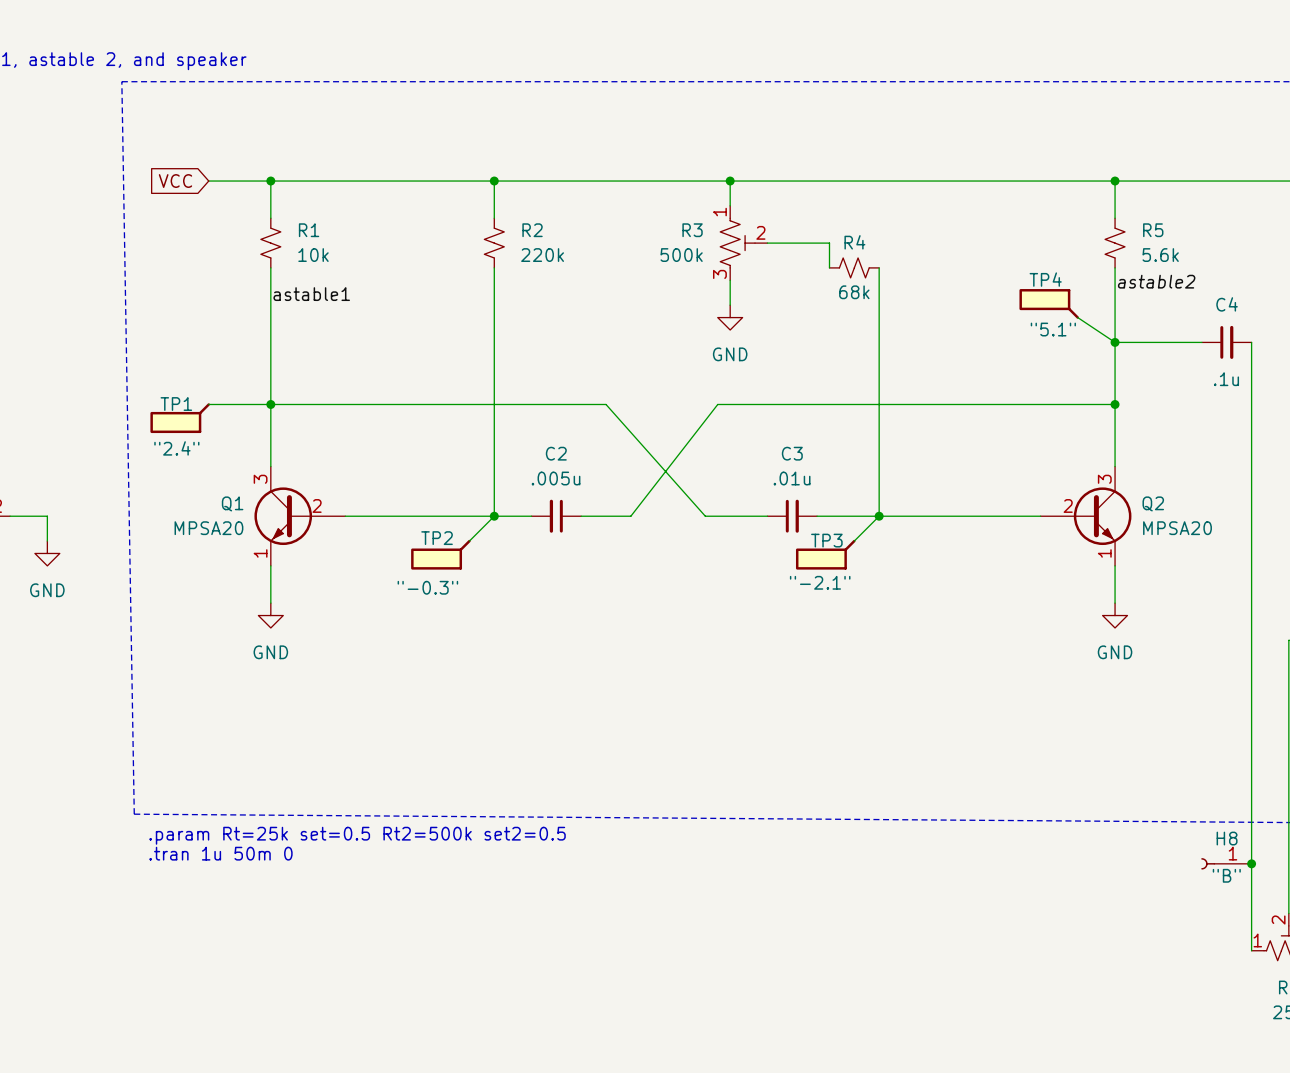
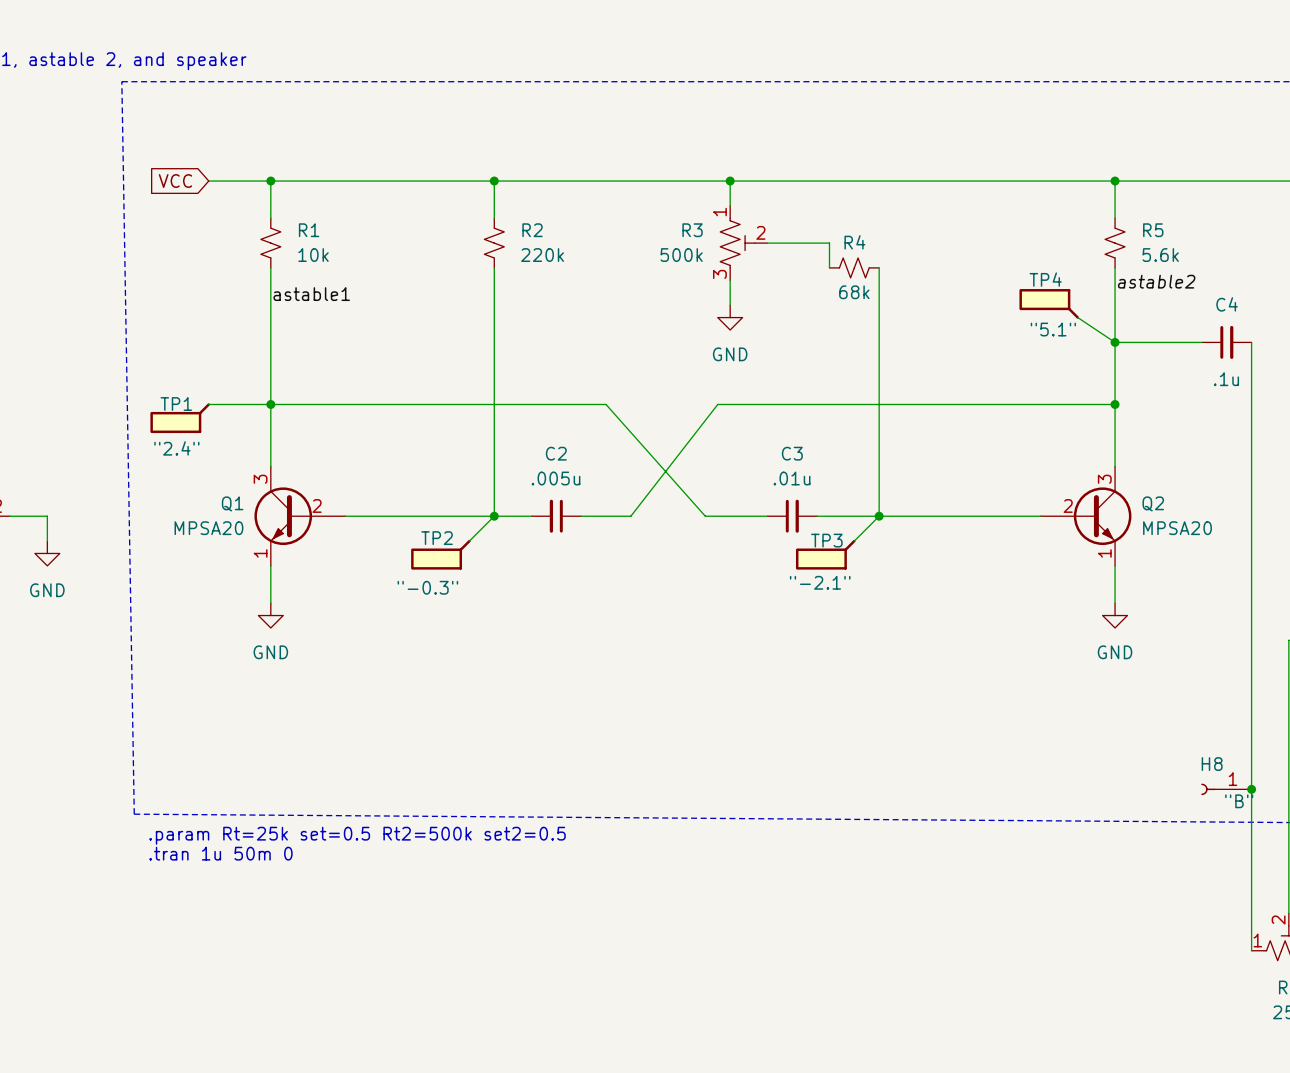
junction: none -> (1251, 789)
H8 name position: H8 (1227, 838) -> H8 (1212, 764)
H8 position: (1226, 863) -> (1226, 789)
junction: (1251, 863) -> none
H8 value position: "B" (1226, 875) -> "B" (1239, 801)

